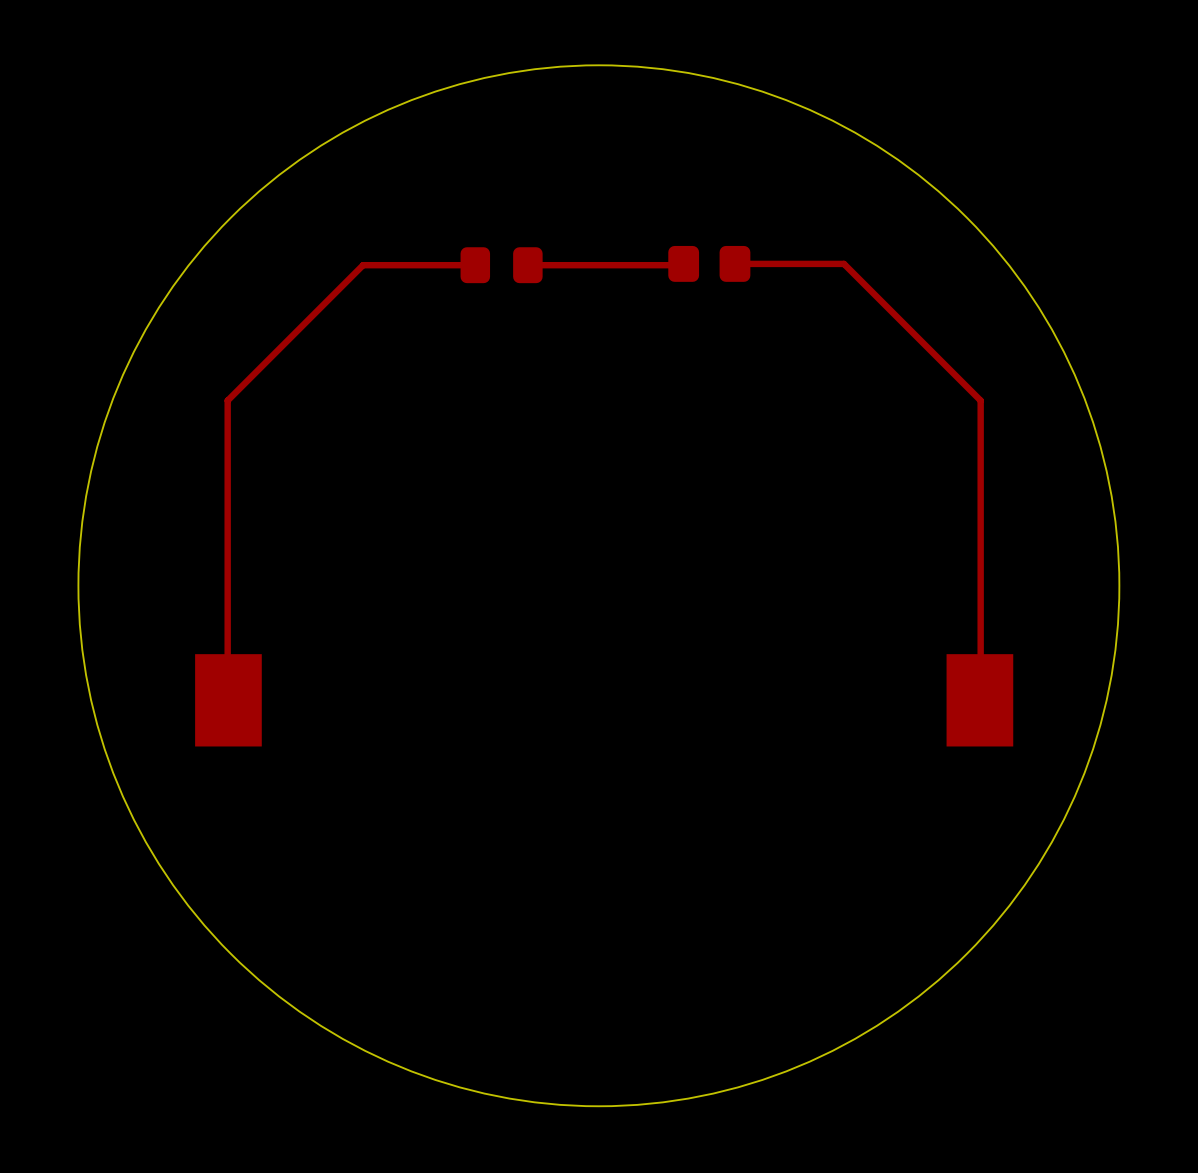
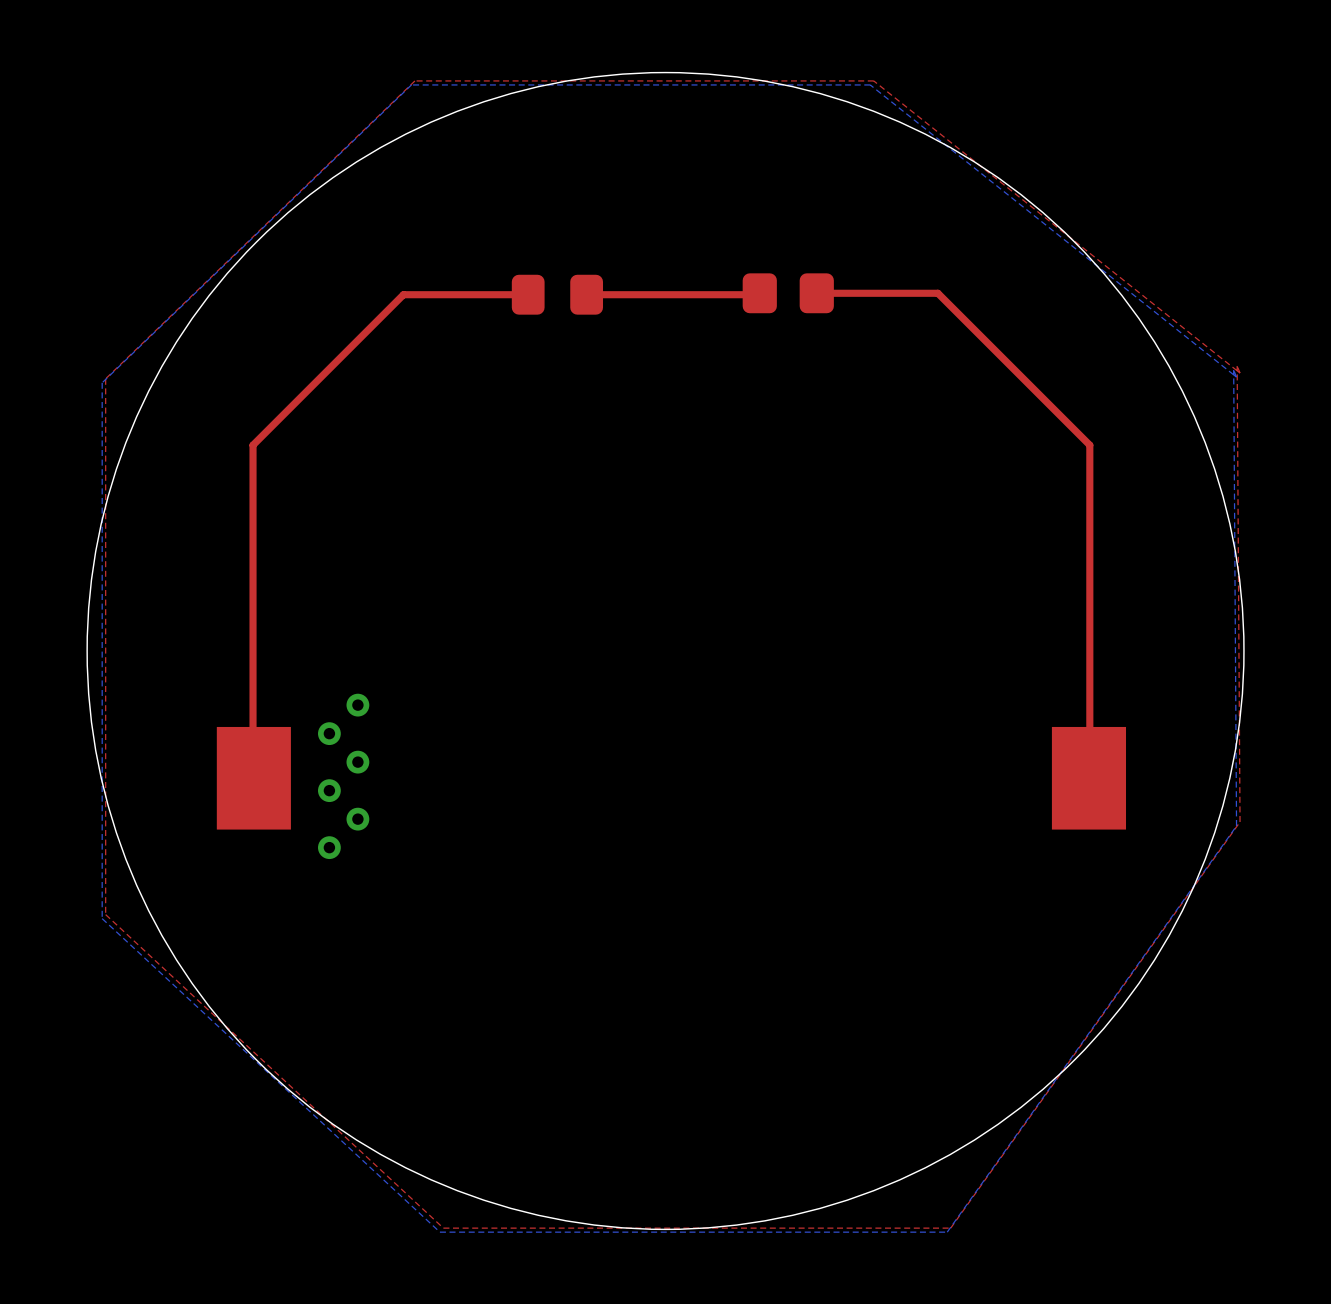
top zone outline: none -> (873, 80) (1240, 373) (1237, 365) (1240, 821) (950, 1228) (443, 1228) (105, 914) (105, 378) (414, 80) (873, 80)
bottom zone outline: none -> (870, 84) (1236, 377) (1233, 369) (1236, 826) (947, 1232) (439, 1232) (102, 918) (102, 382) (411, 84) (870, 84)
via: none -> (357, 705)
via: none -> (329, 733)
via: none -> (357, 762)
via: none -> (329, 790)
via: none -> (357, 819)
via: none -> (329, 847)

